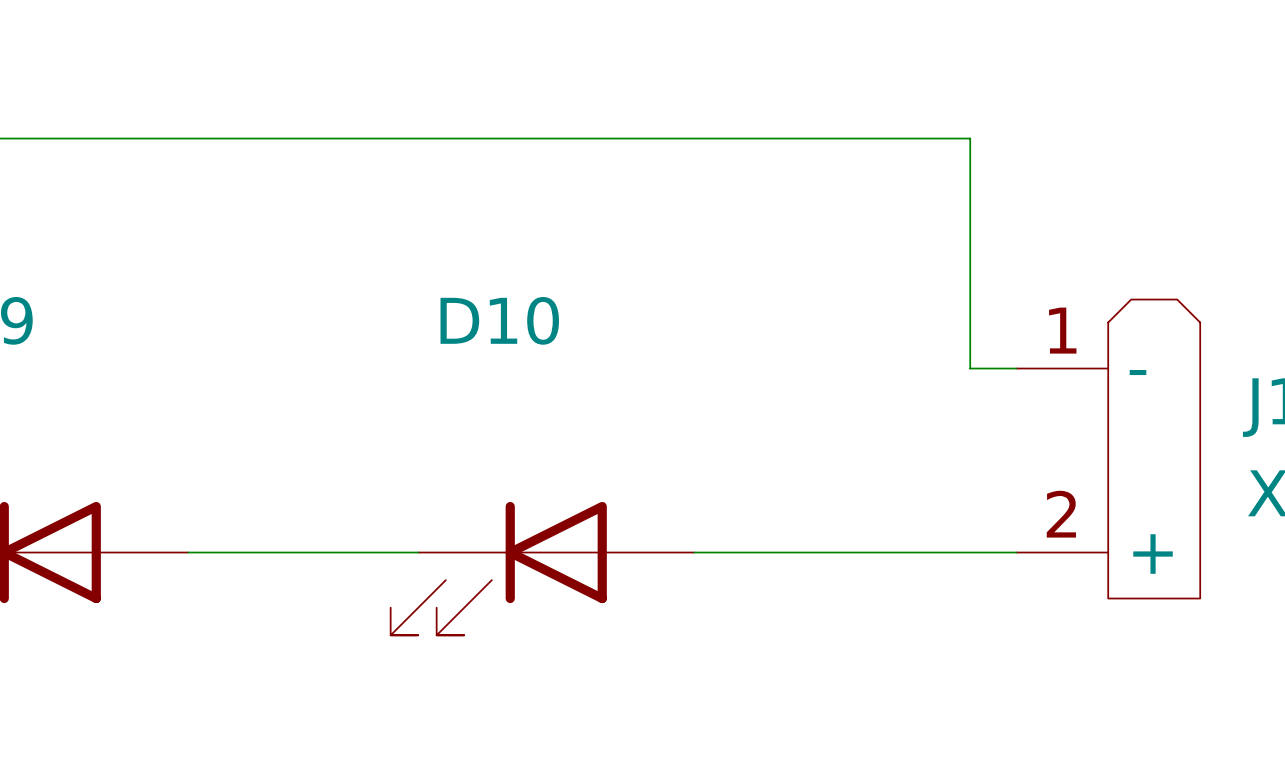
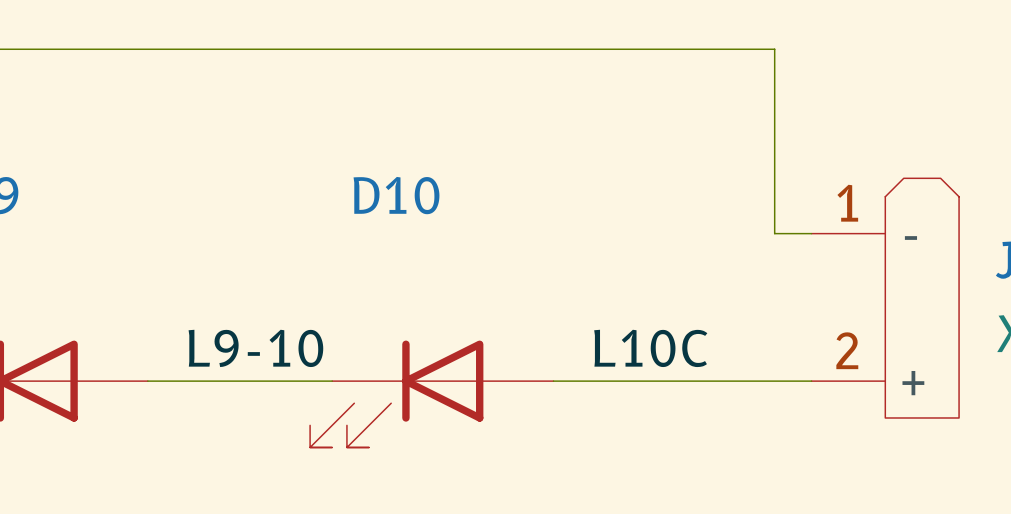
label: none -> L9-10 (255, 348)
label: none -> L10C (650, 348)

